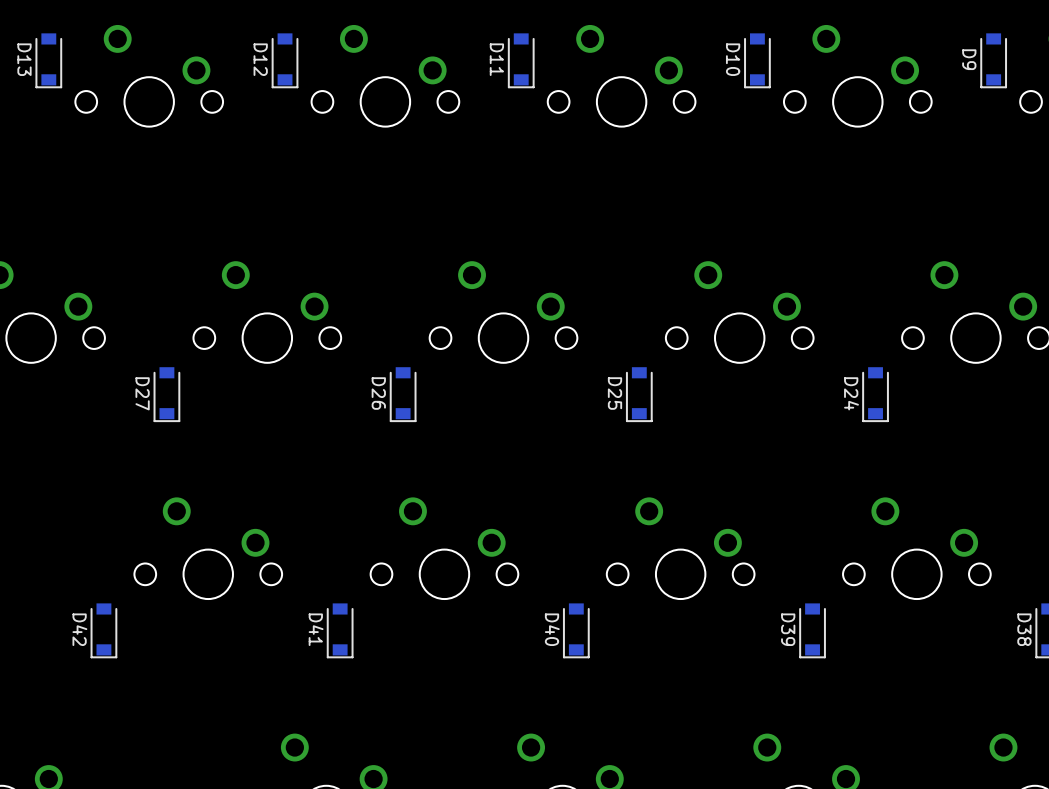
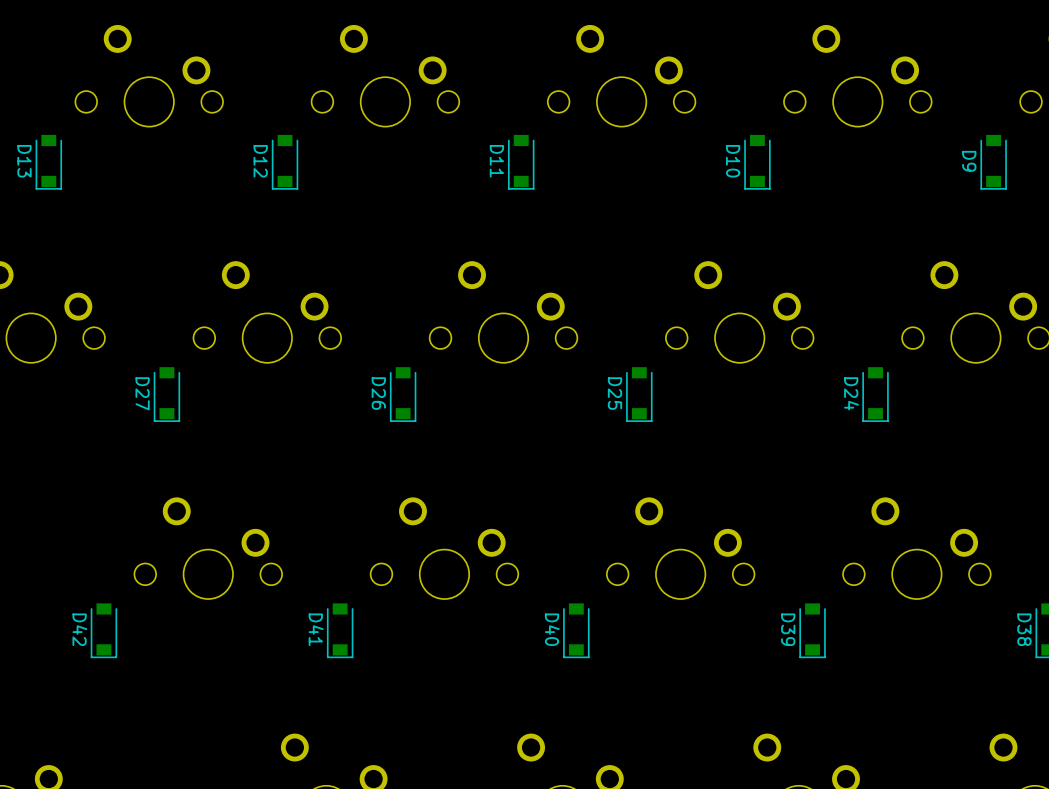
D13 position: (48, 60) -> (48, 162)
D12 position: (285, 60) -> (285, 162)
D11 position: (521, 60) -> (521, 162)
D10 position: (757, 60) -> (757, 162)
D9 position: (993, 60) -> (993, 162)

